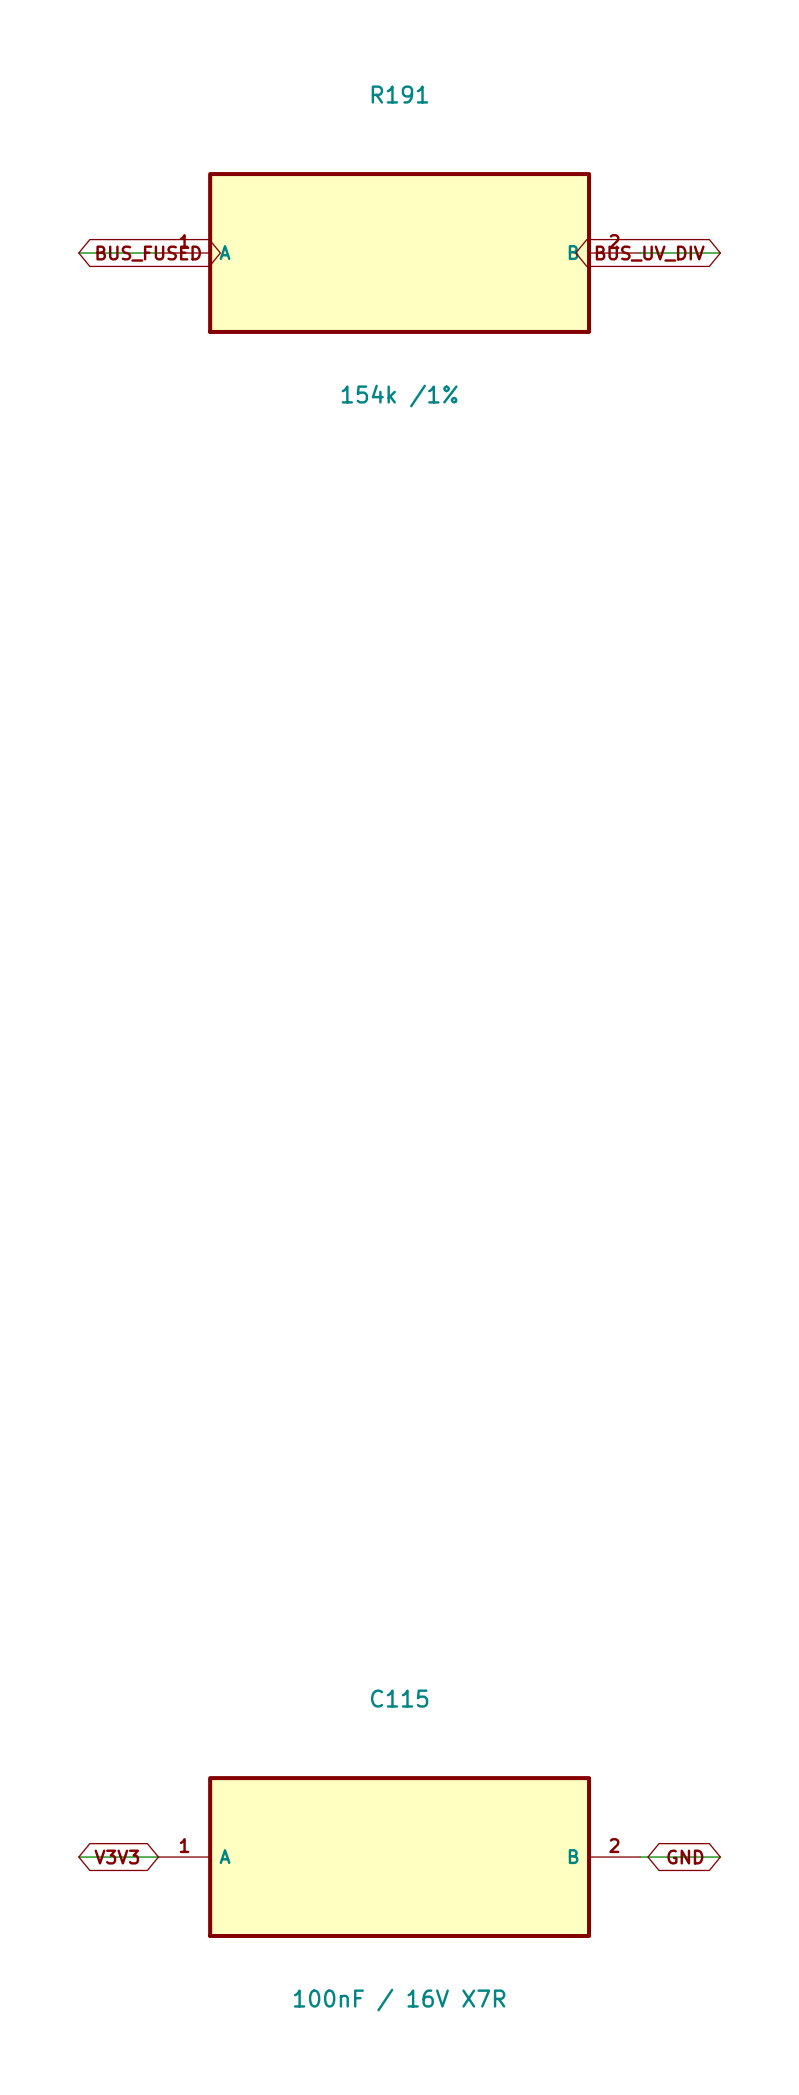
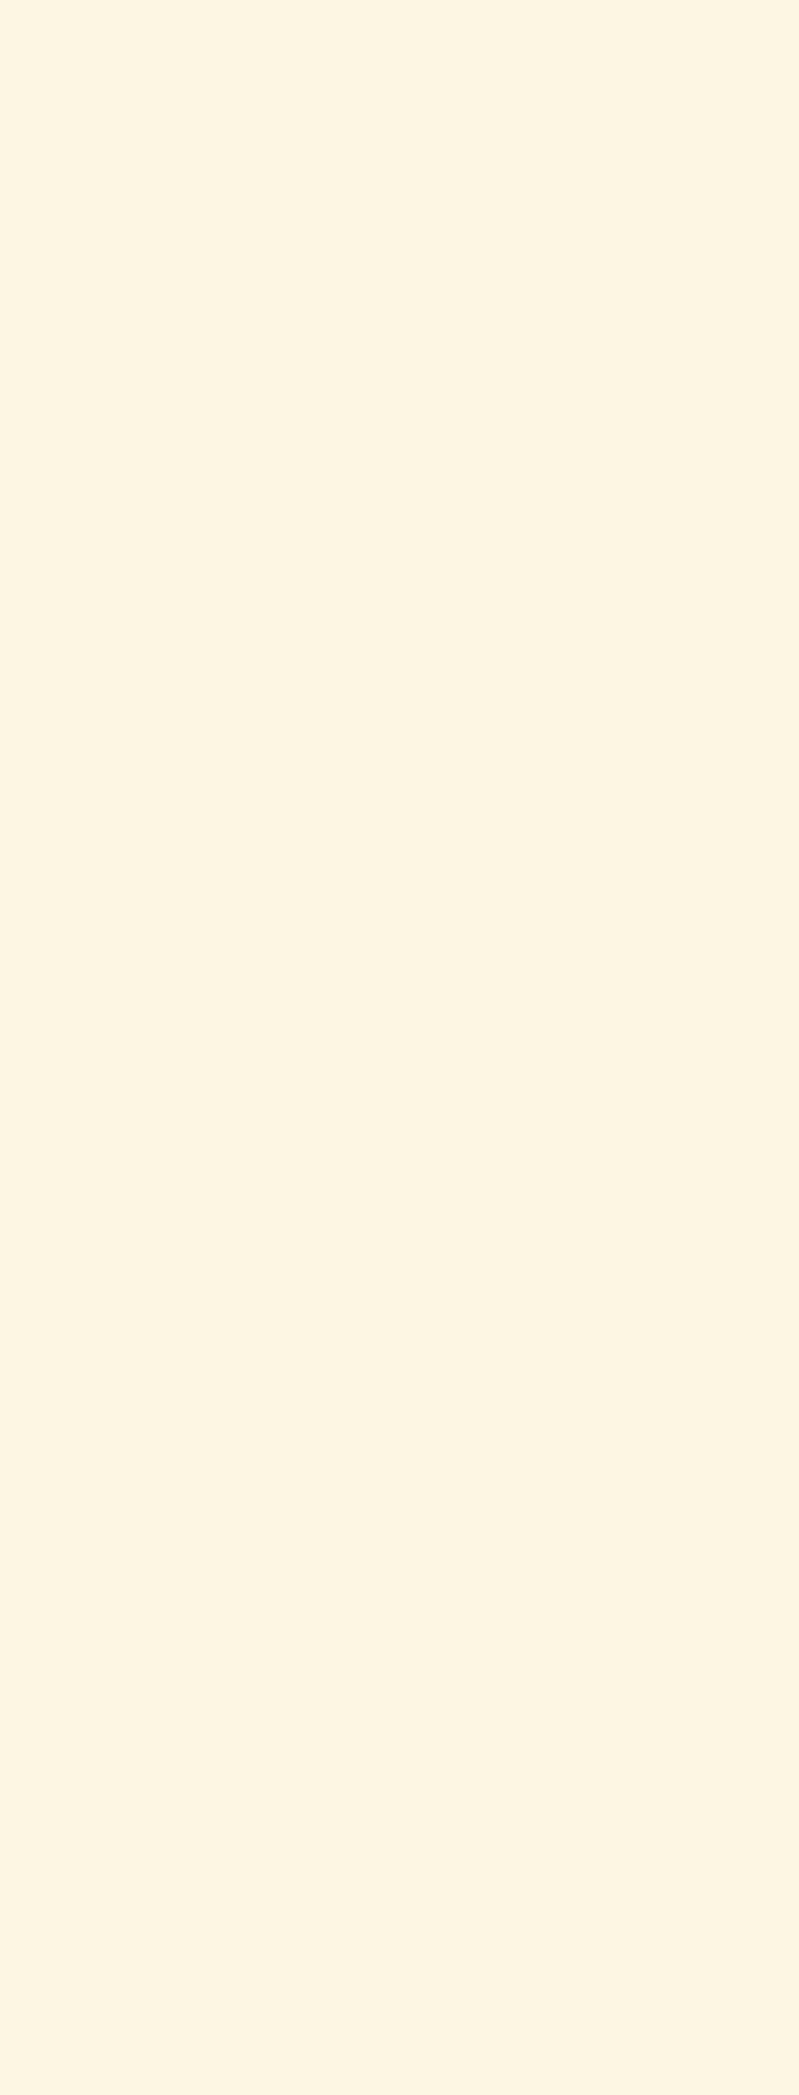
wire: (78, 253) (158, 253) -> none
global label: BUS_FUSED (148, 253) -> none
R191: 154k /1% (399, 253) -> none
wire: (640, 253) (720, 253) -> none
global label: BUS_UV_DIV (650, 253) -> none
wire: (78, 1857) (158, 1857) -> none
global label: V3V3 (116, 1857) -> none
C115: 100nF / 16V X7R (399, 1857) -> none
wire: (640, 1857) (720, 1857) -> none
global label: GND (685, 1857) -> none

